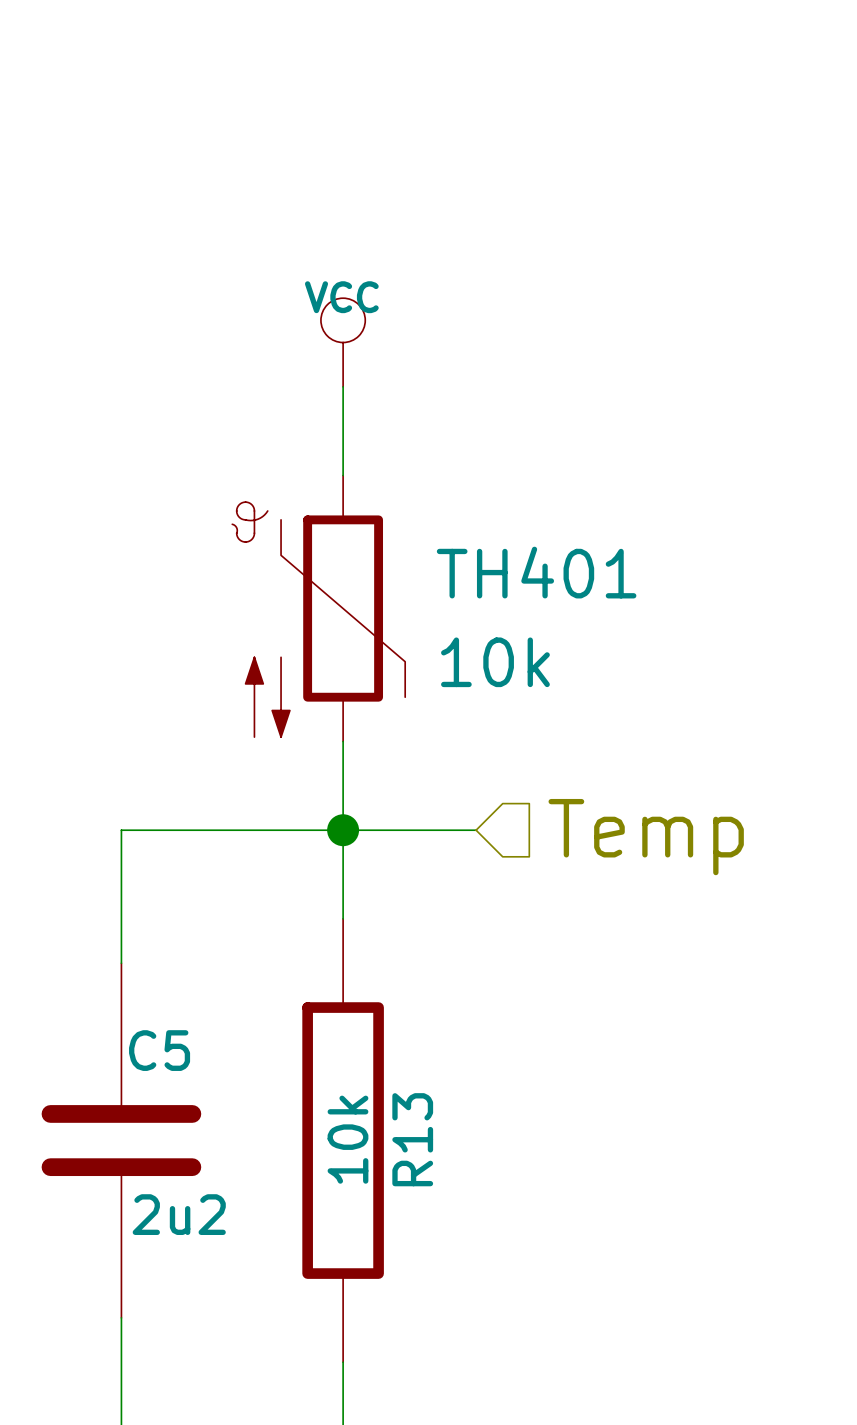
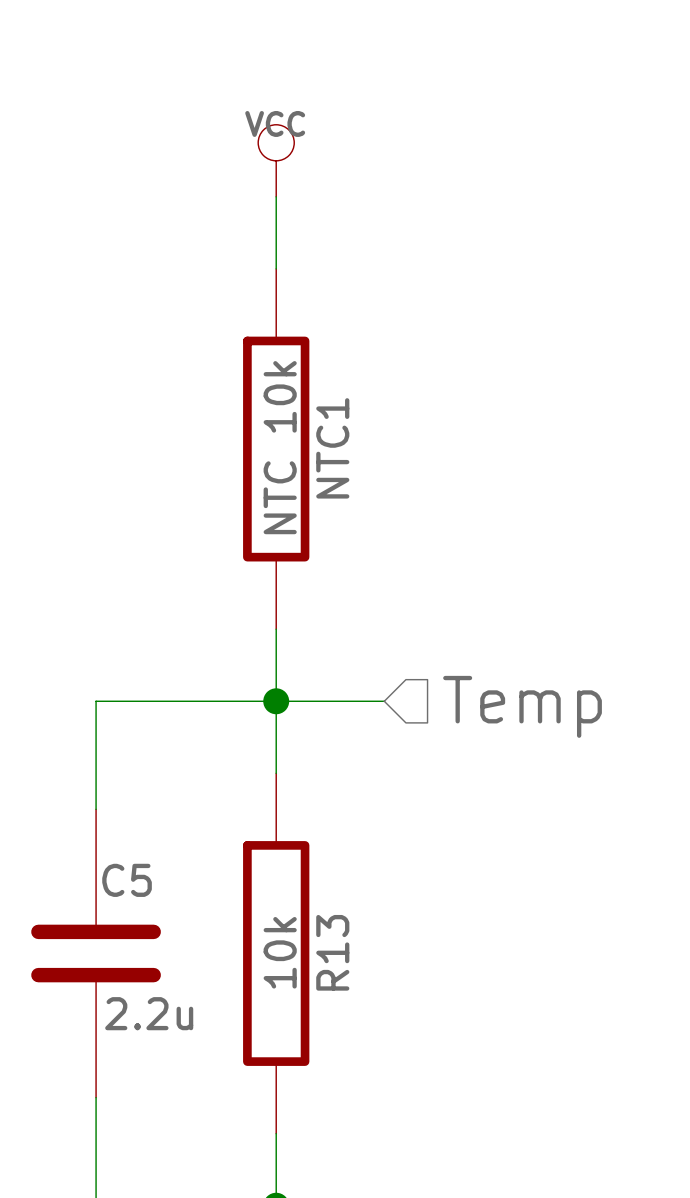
power symbol position: VCC (343, 342) -> VCC (276, 160)
wire: (343, 386) (343, 475) -> (276, 196) (276, 268)
NTC1: none -> NTC 10k (276, 449)
TH401: 10k (318, 608) -> none
C5 value: 2u2 (179, 1214) -> 2.2u (149, 1013)

